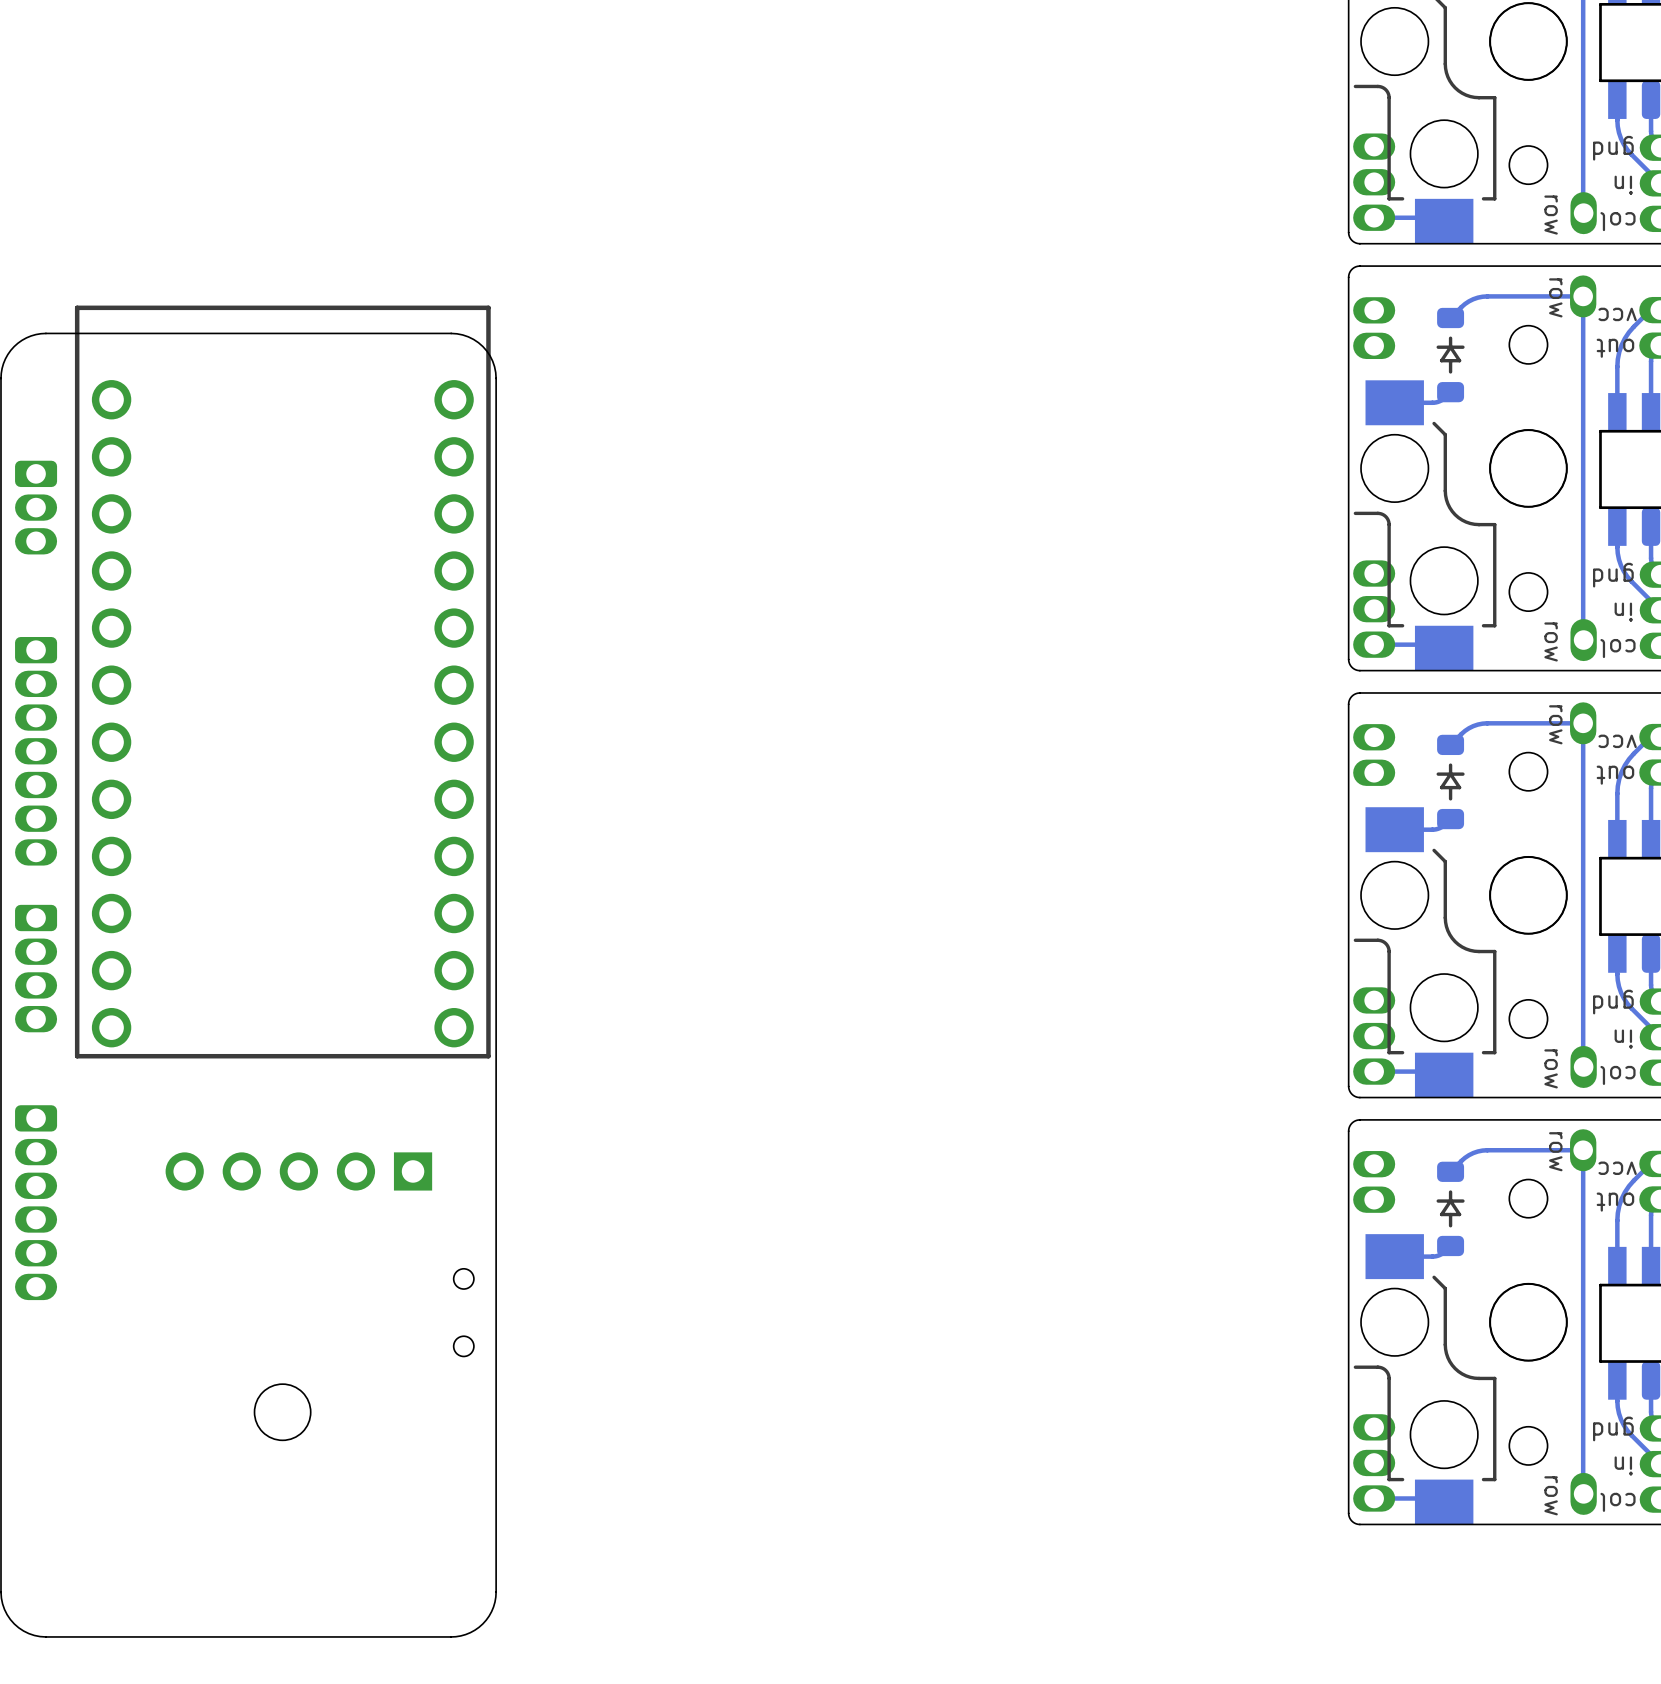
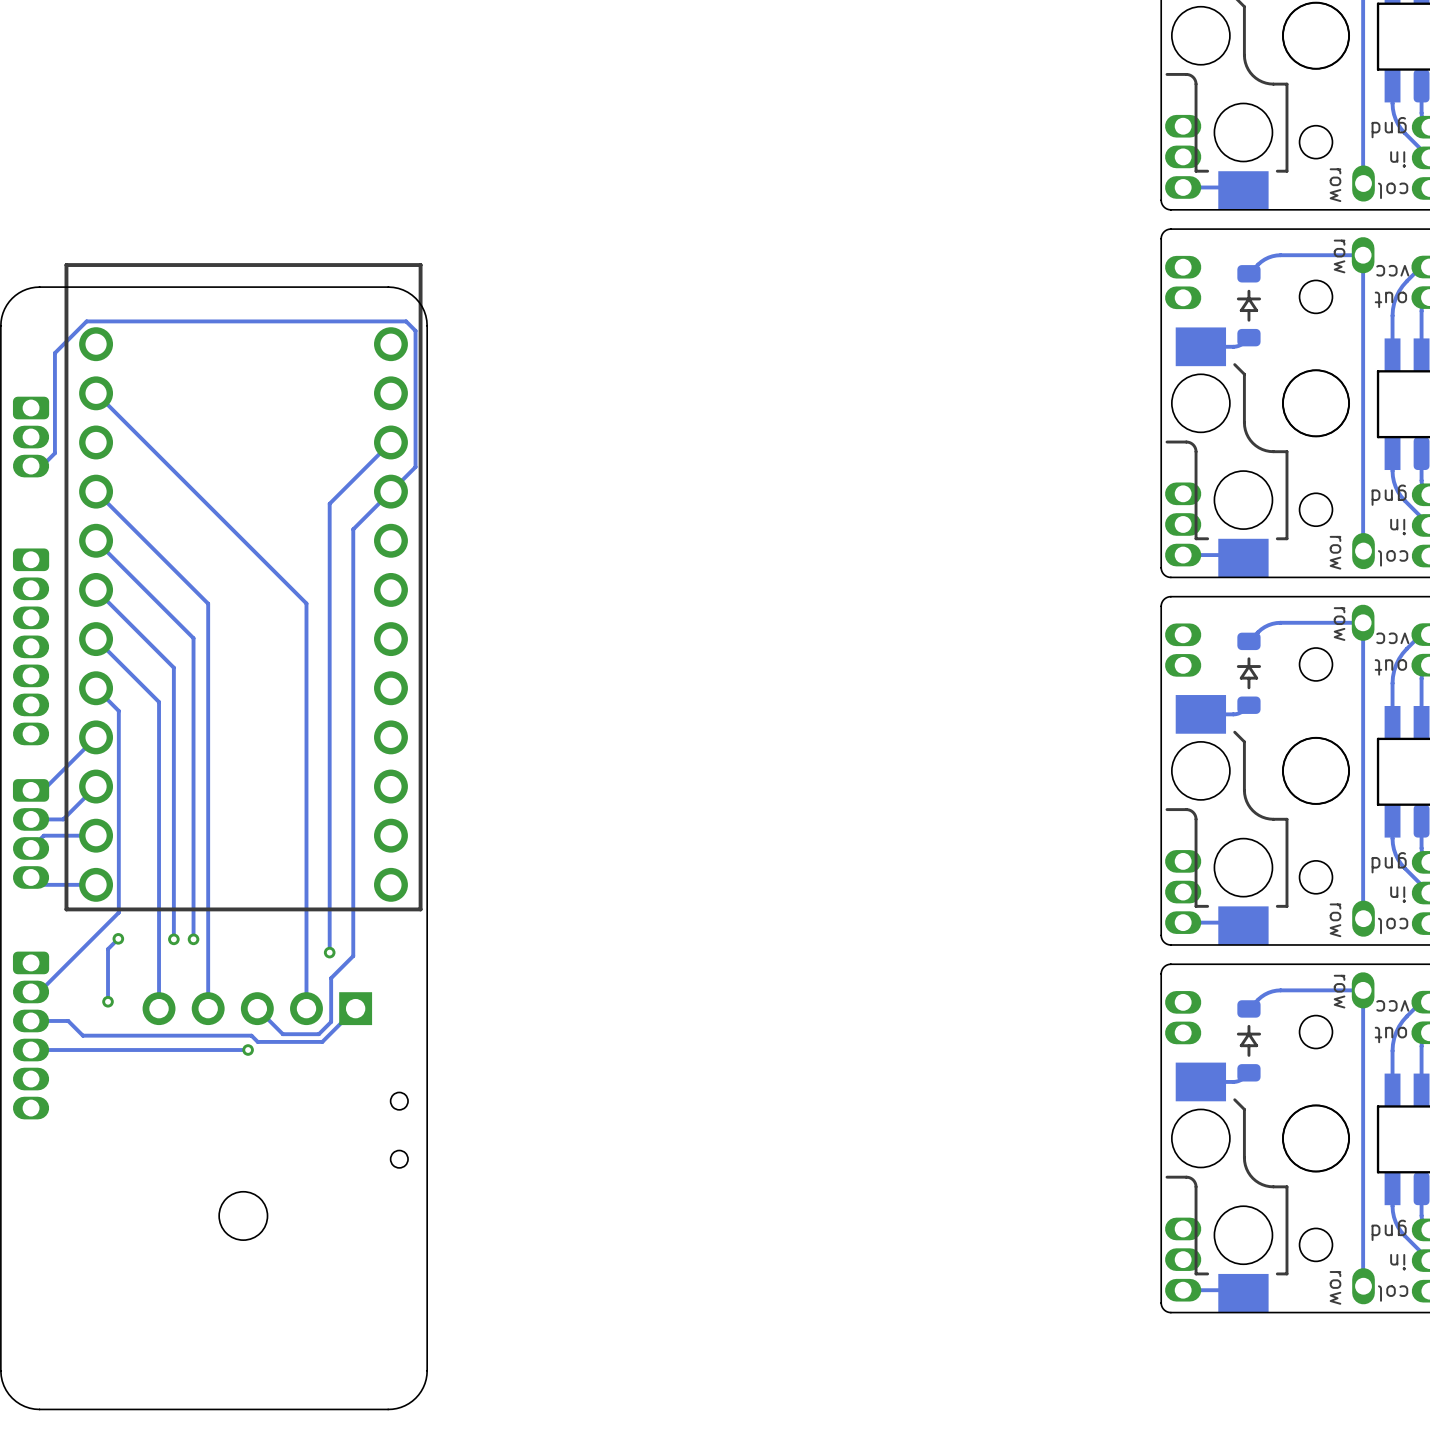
track: none -> (96, 393) (306, 603) (306, 1008)
track: none -> (390, 442) (329, 503) (329, 952)
track: none -> (31, 466) (42, 466) (54, 453) (54, 353) (86, 321) (406, 321) (415, 330) (415, 467) (353, 529) (353, 956) (331, 978) (331, 1021) (318, 1034) (282, 1034) (257, 1008)
track: none -> (96, 491) (208, 603) (208, 1008)
track: none -> (96, 540) (193, 638) (193, 939)
track: none -> (96, 589) (173, 667) (173, 939)
track: none -> (96, 639) (159, 702) (159, 1008)
track: none -> (96, 688) (118, 711) (118, 912) (39, 991) (31, 991)
track: none -> (96, 737) (43, 790) (31, 790)
track: none -> (96, 786) (63, 819) (31, 819)
track: none -> (96, 835) (43, 835) (31, 848)
track: none -> (31, 877) (38, 884) (96, 884)
track: none -> (118, 938) (108, 949) (108, 1001)
via: none -> (118, 938)
via: none -> (173, 939)
via: none -> (193, 939)
via: none -> (329, 952)
via: none -> (108, 1001)
track: none -> (355, 1008) (322, 1041) (257, 1041) (251, 1035) (82, 1035) (68, 1020) (31, 1020)
track: none -> (248, 1050) (31, 1050)
via: none -> (248, 1050)

